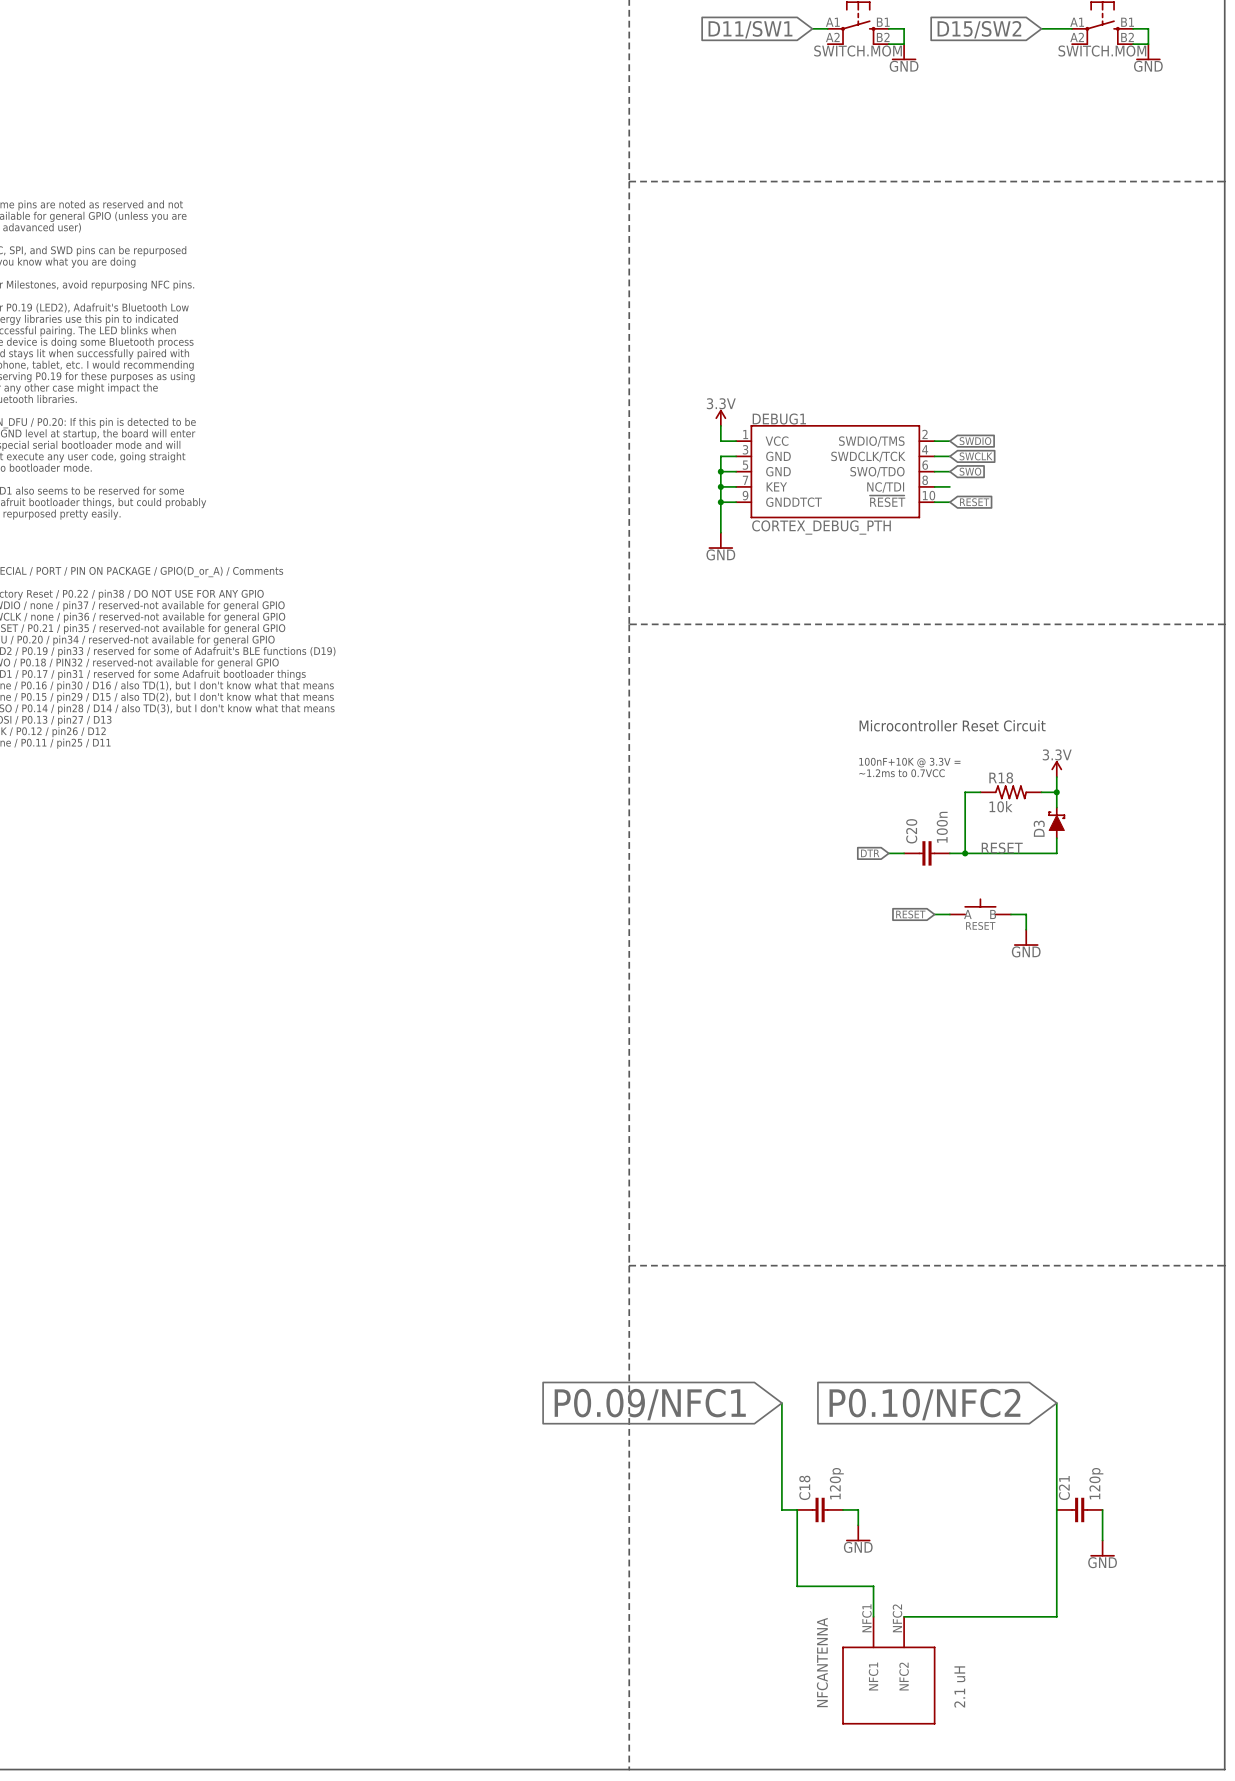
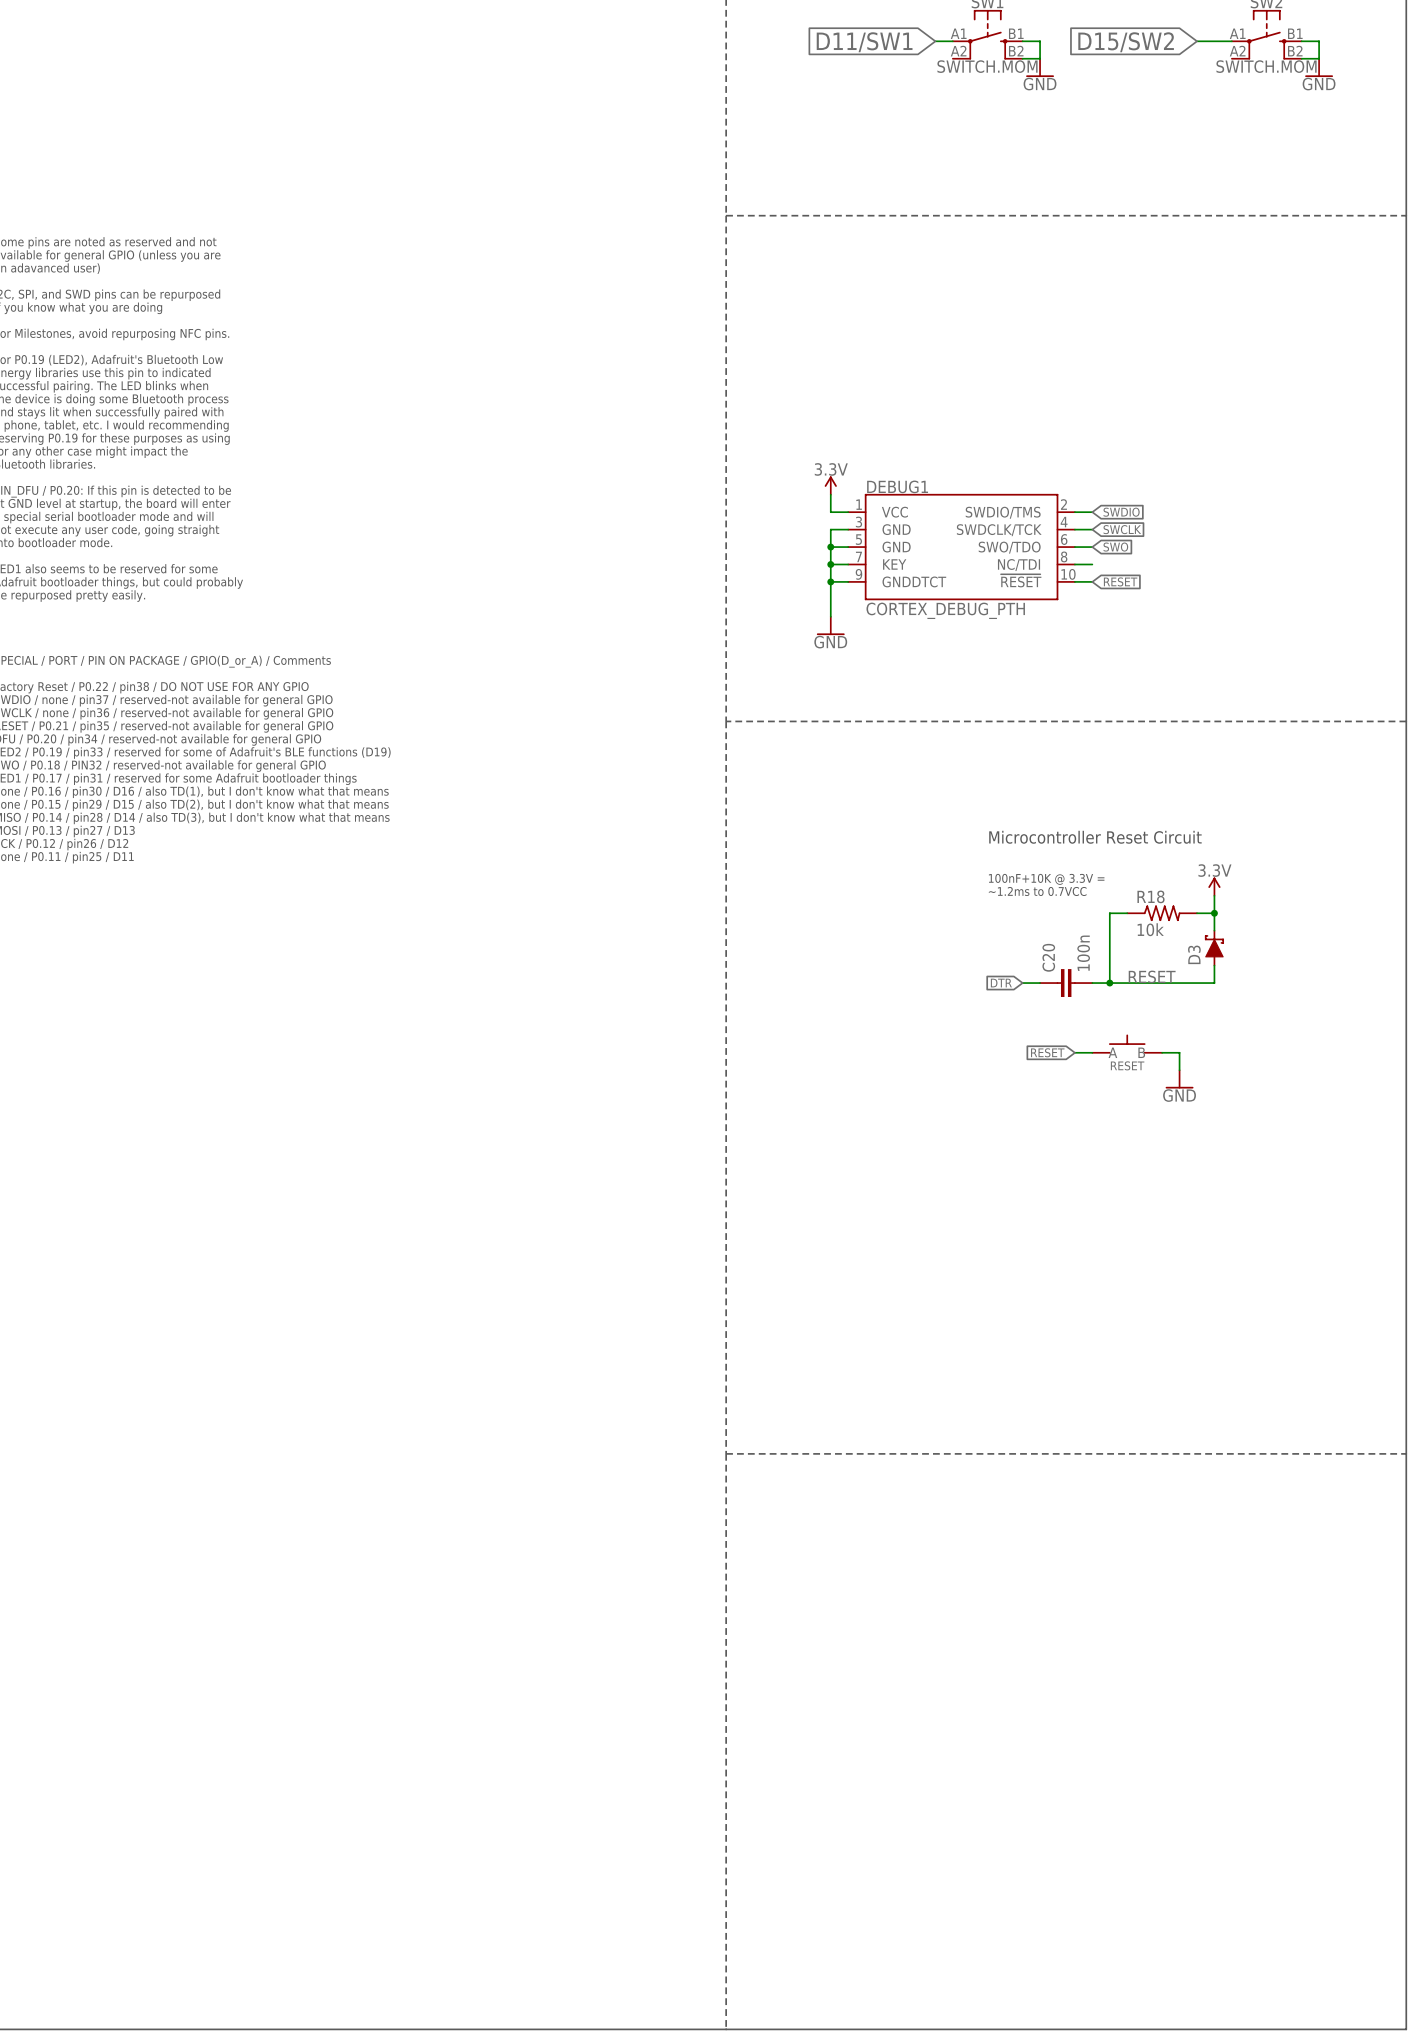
wire: (781, 1403) (781, 1509) (797, 1509) (797, 1586) (873, 1586) (873, 1616) -> none
wire: (1056, 1403) (1056, 1616) (904, 1616) -> none
global label: P0.09/NFC1 (650, 1404) -> none
global label: P0.10/NFC2 (924, 1404) -> none
C18: 120p (820, 1509) -> none
wire: (843, 1509) (858, 1509) (858, 1525) -> none
C21: 120p (1079, 1509) -> none
wire: (1102, 1509) (1102, 1540) -> none
power symbol: GND (858, 1533) -> none
power symbol: GND (1102, 1548) -> none
NFCANTENNA: 2.1 uH (888, 1670) -> none

